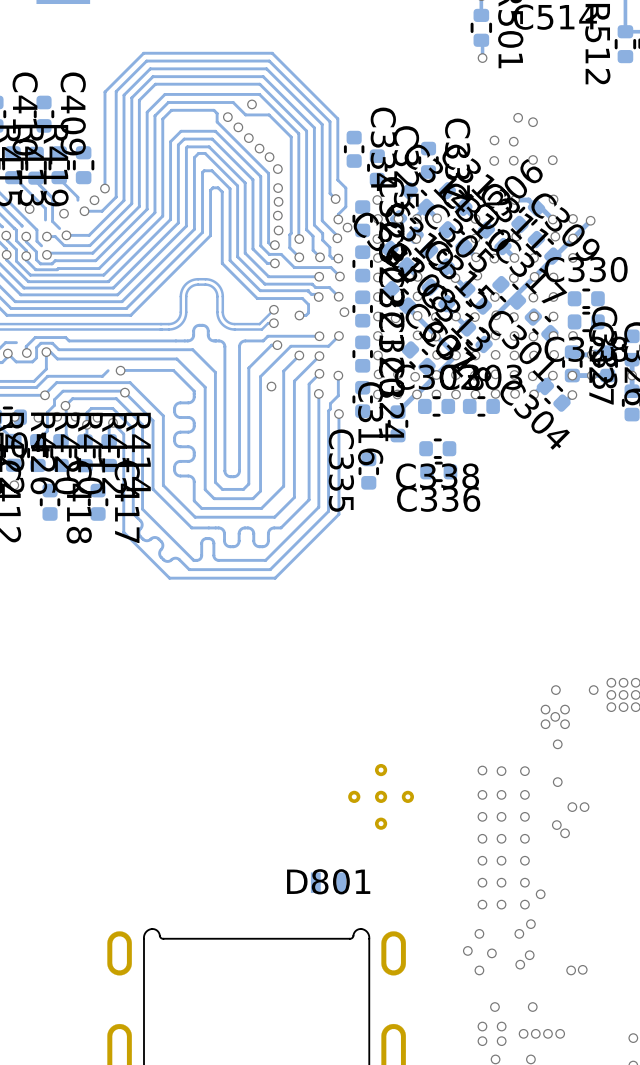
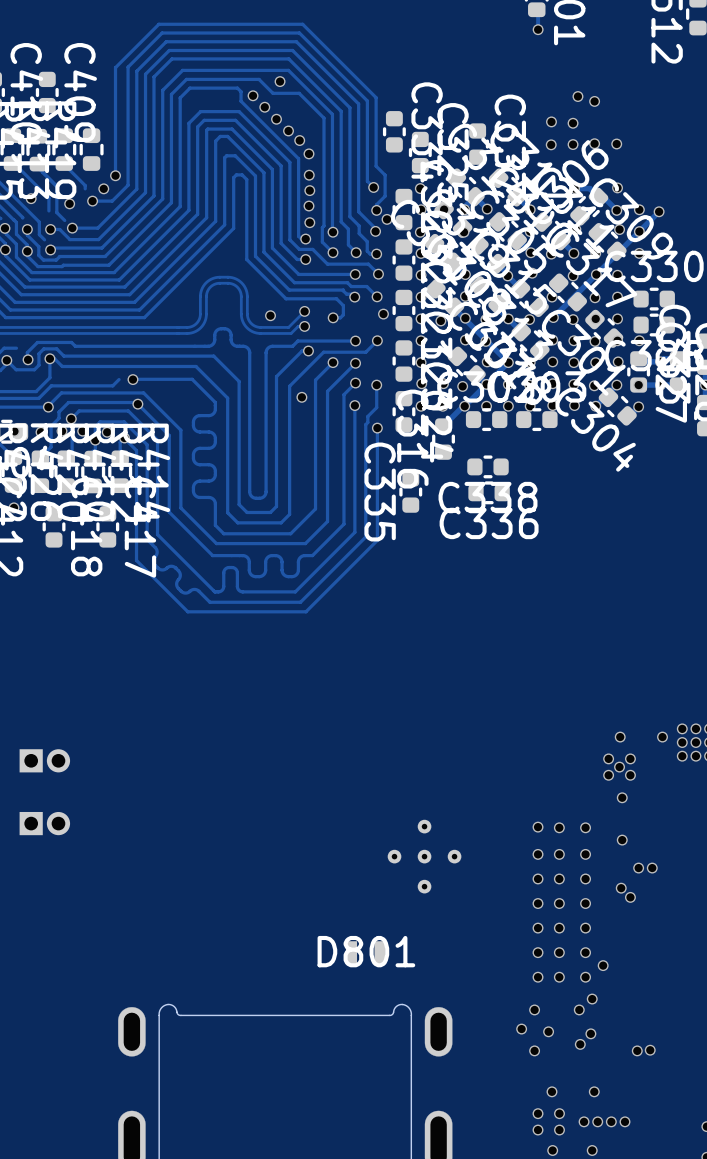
via: none -> (270, 315)
part: none -> (44, 760)
part: none -> (44, 823)

